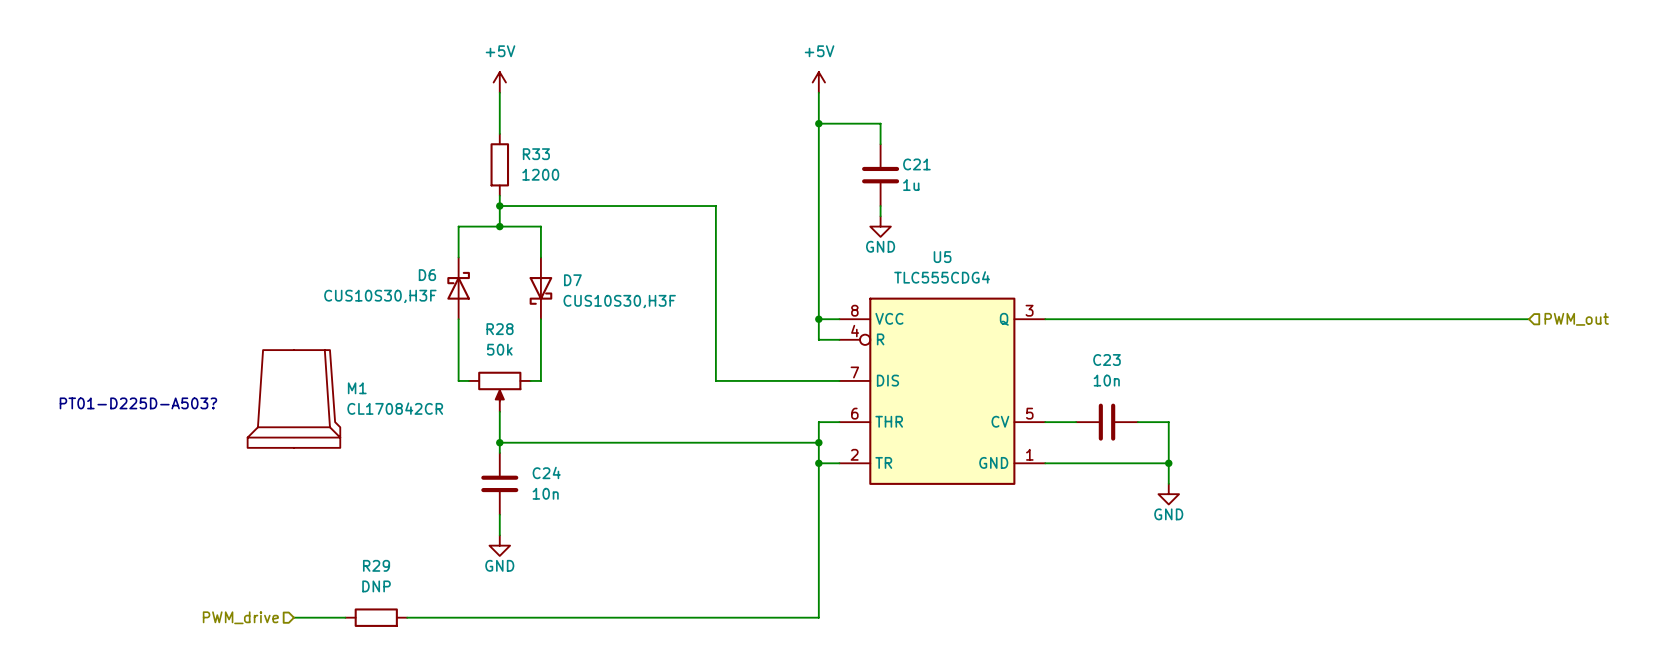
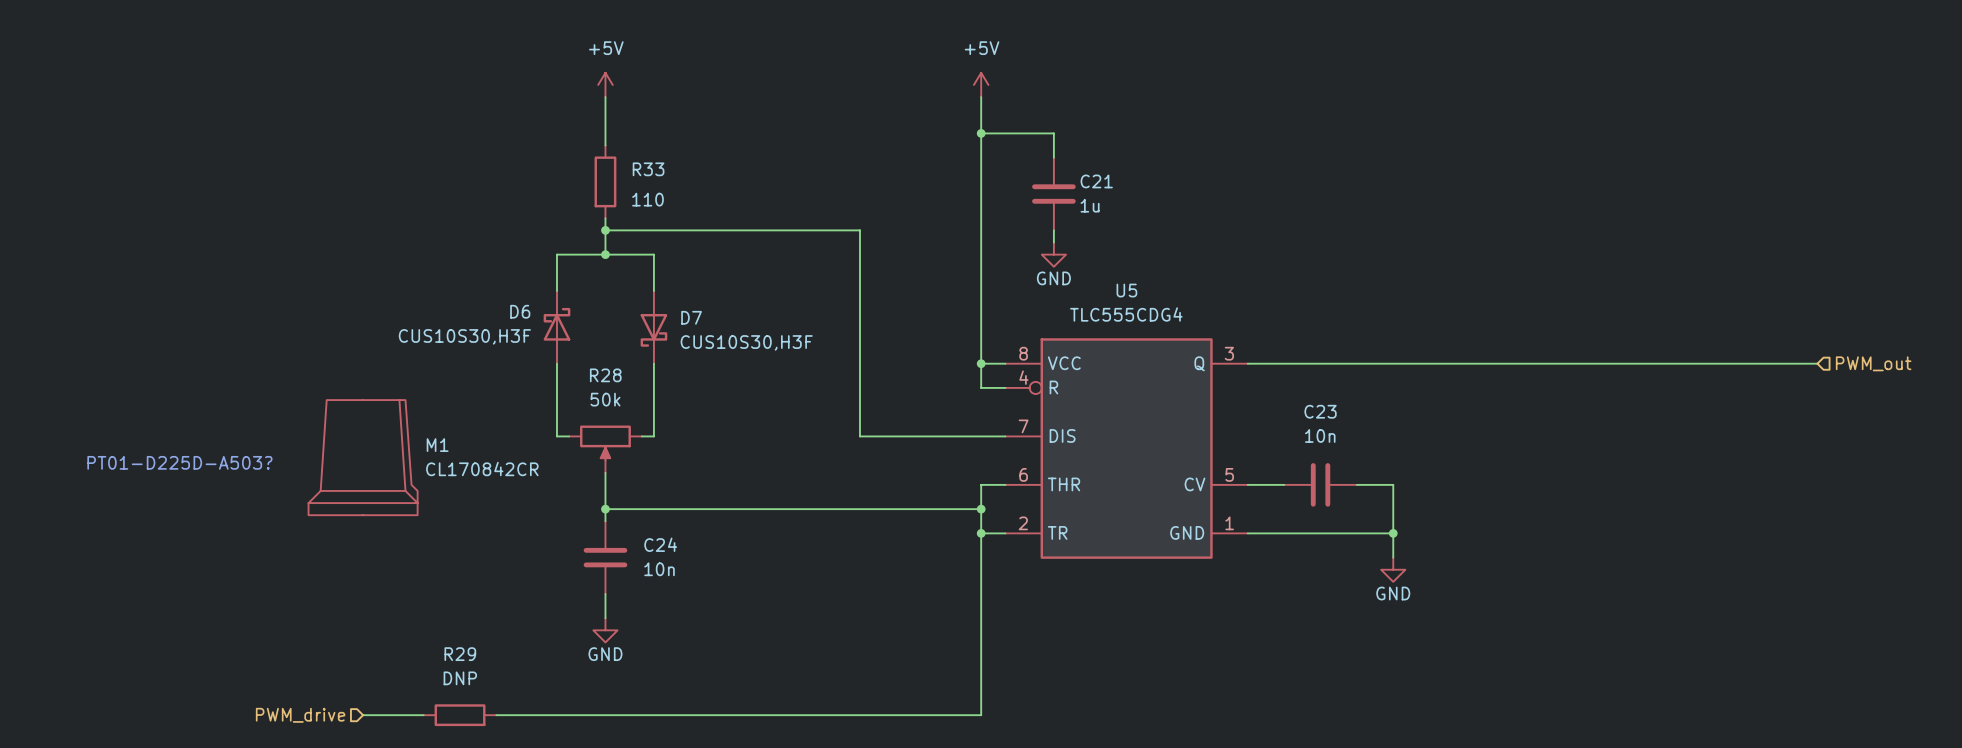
R33 text: 1200 (540, 174) -> 110 (647, 199)

